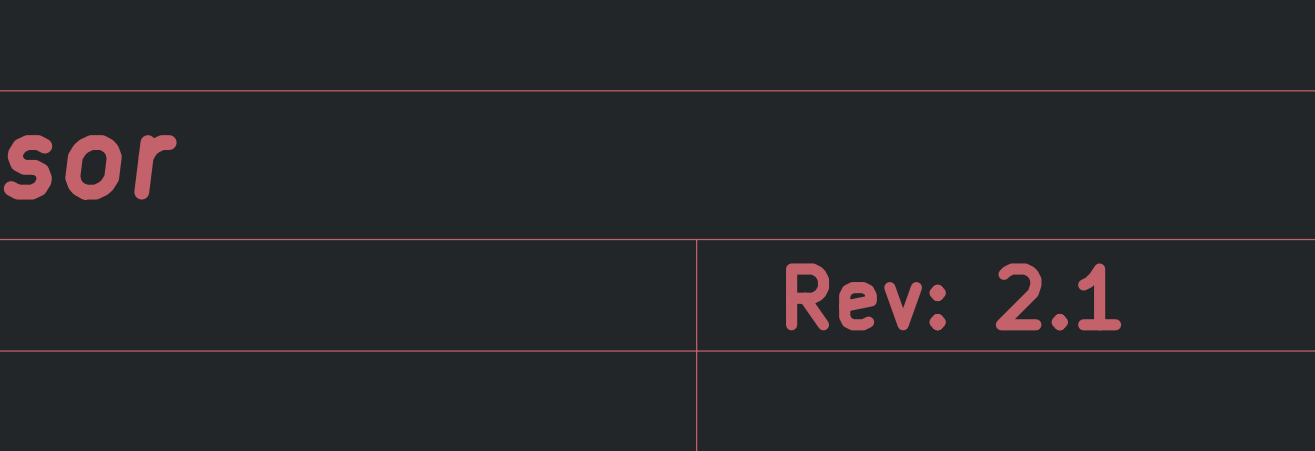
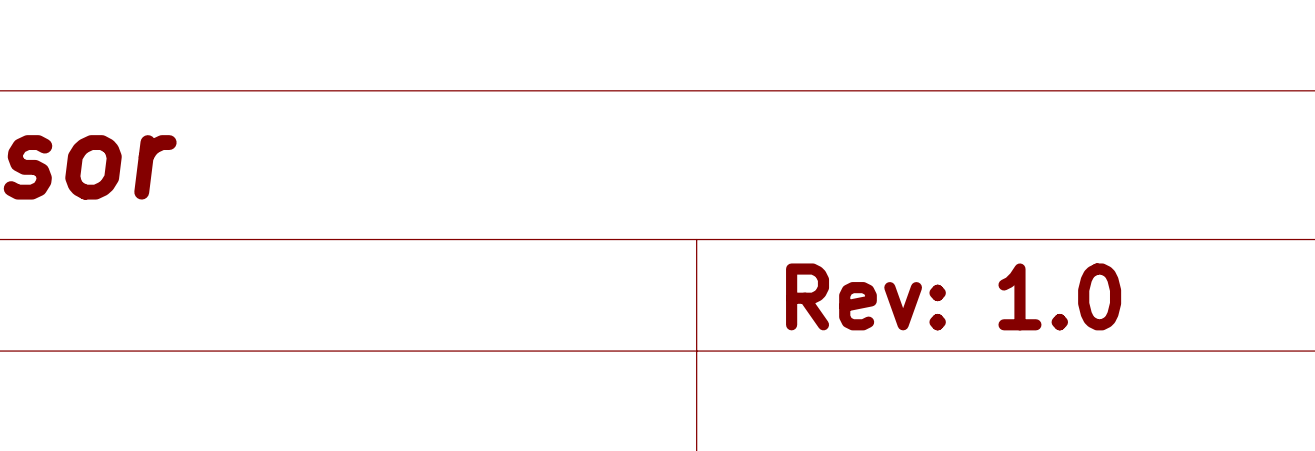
title block: Rev: 2.1 (953, 296) -> Rev: 1.0 (953, 296)

